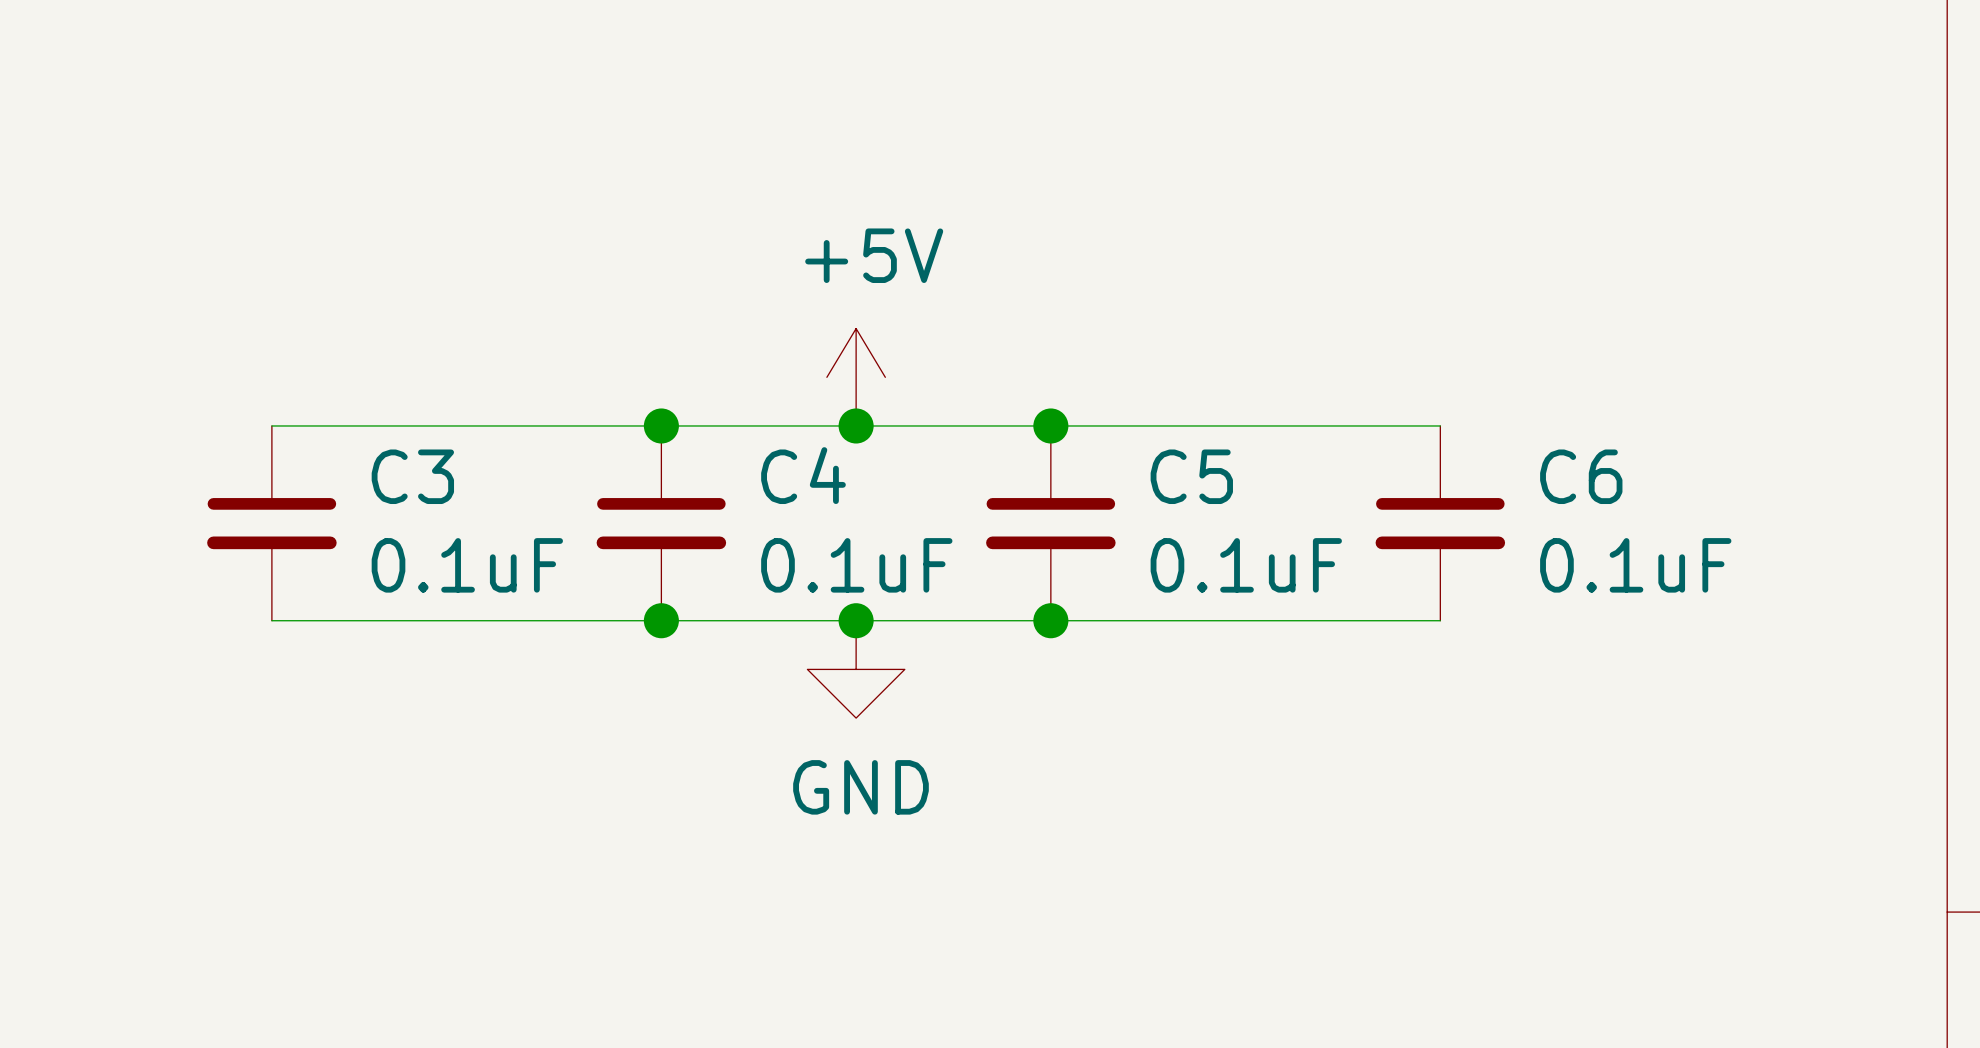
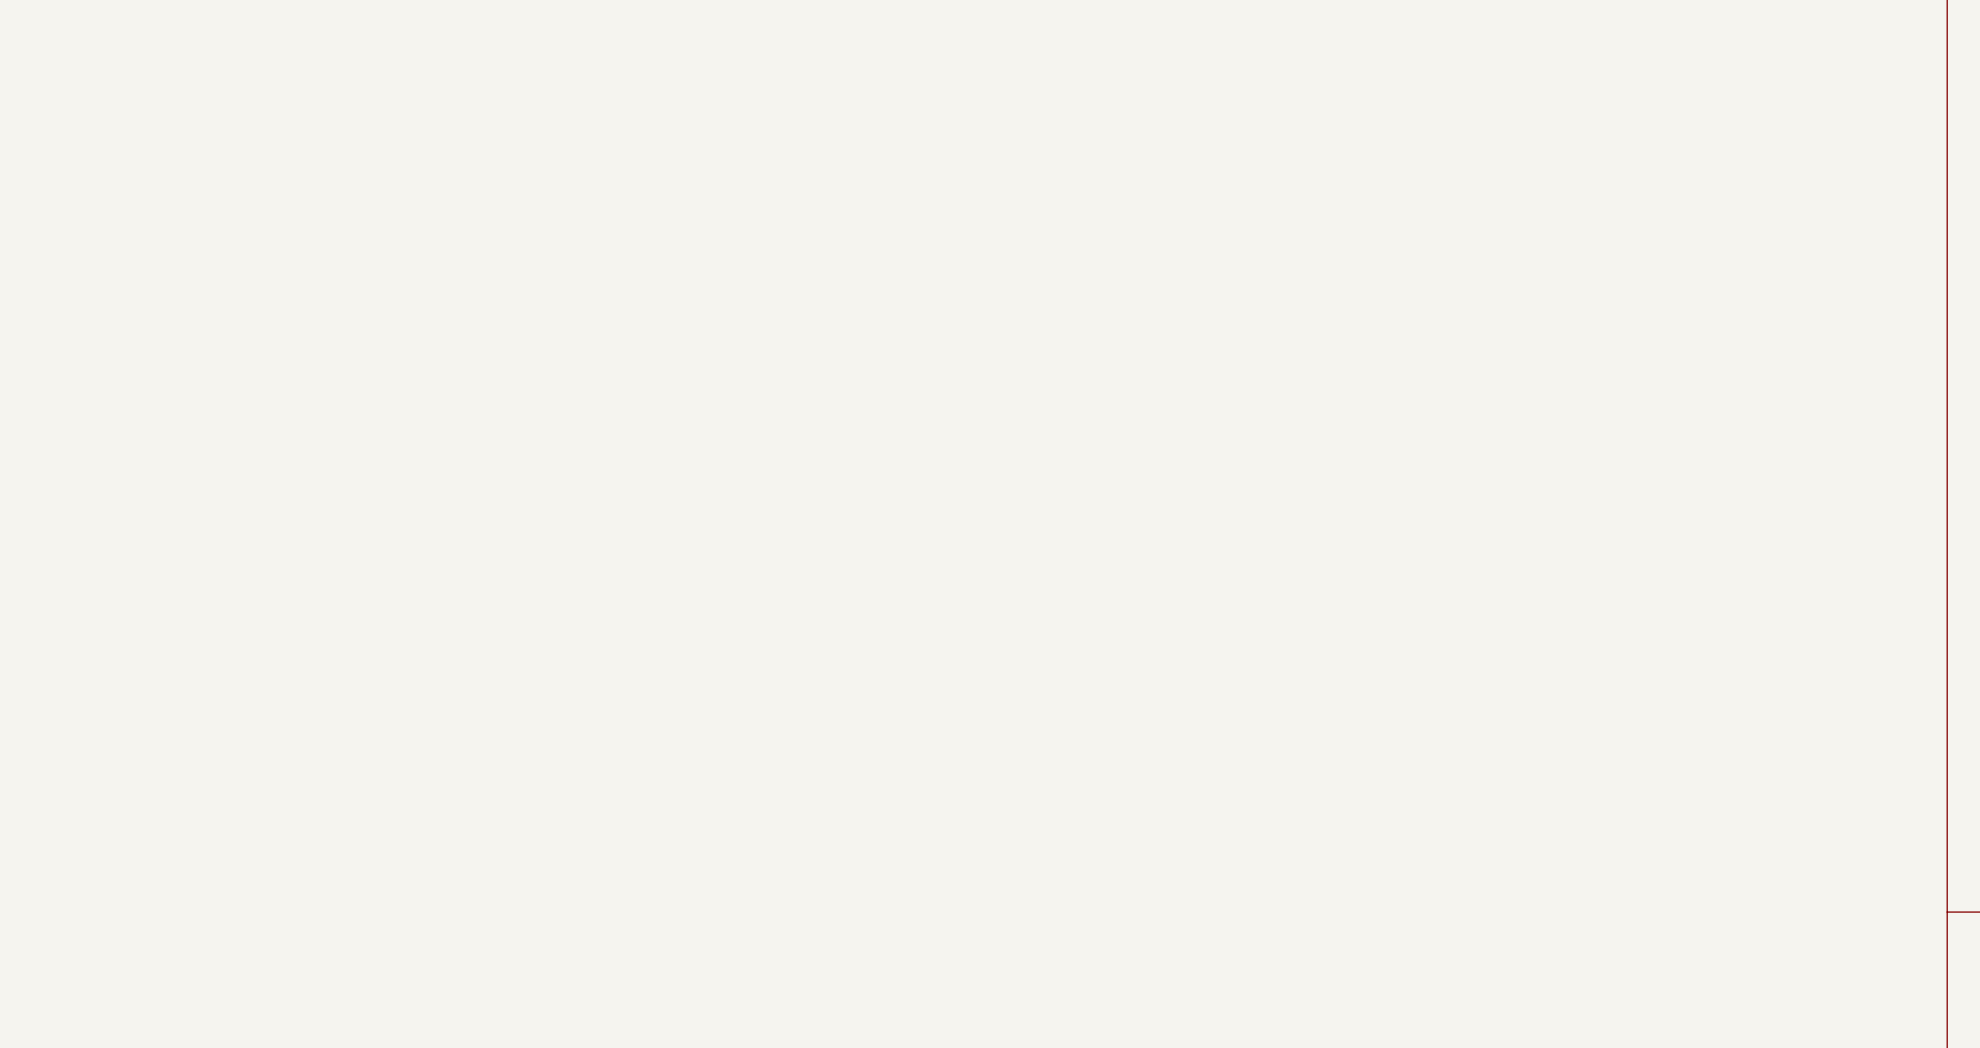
power symbol: +5V (856, 377) -> none
wire: (271, 425) (1440, 425) -> none
junction: (661, 425) -> none
junction: (856, 425) -> none
junction: (1050, 425) -> none
C3: 0.1uF (271, 523) -> none
C4: 0.1uF (661, 523) -> none
C5: 0.1uF (1050, 523) -> none
C6: 0.1uF (1440, 523) -> none
wire: (271, 620) (1440, 620) -> none
junction: (661, 620) -> none
junction: (856, 620) -> none
junction: (1050, 620) -> none
power symbol: GND (856, 669) -> none

